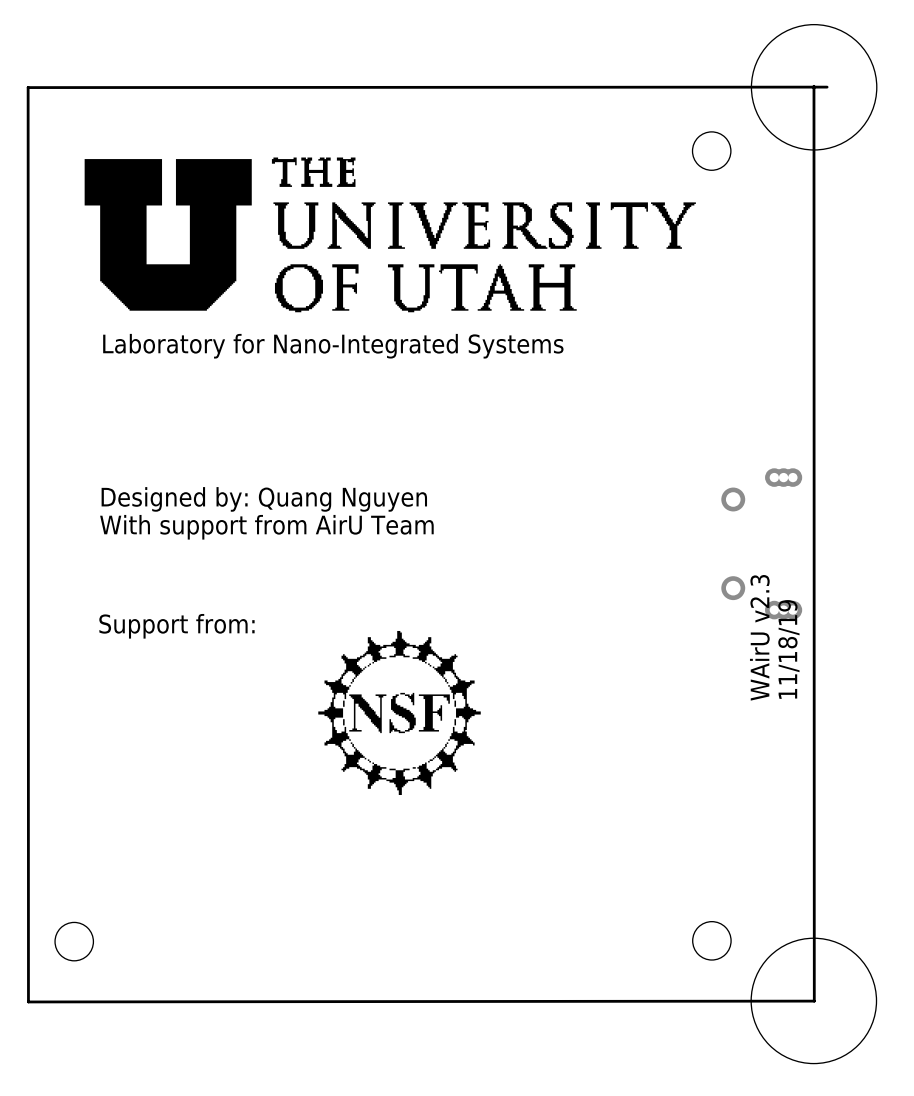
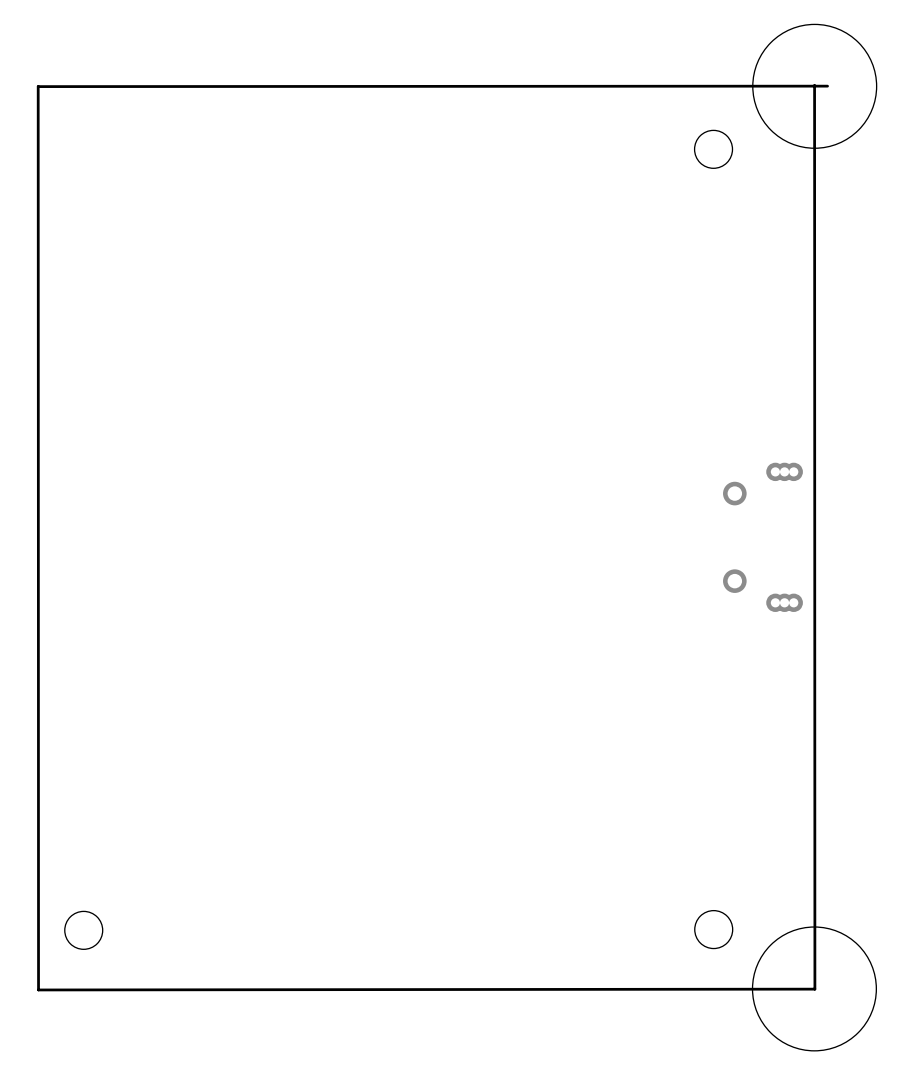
drawing: [84, 157, 696, 313] -> none
text: Laboratory for Nano-Integrated Systems (333, 346) -> none
text: Designed by: Quang Nguyen (264, 499) -> none
text: With support from AirU Team (266, 527) -> none
text: Support from: (176, 626) -> none
drawing: [318, 630, 481, 796] -> none
text: WAirU v2.3 (759, 637) -> none
text: 11/18/19 (788, 649) -> none

